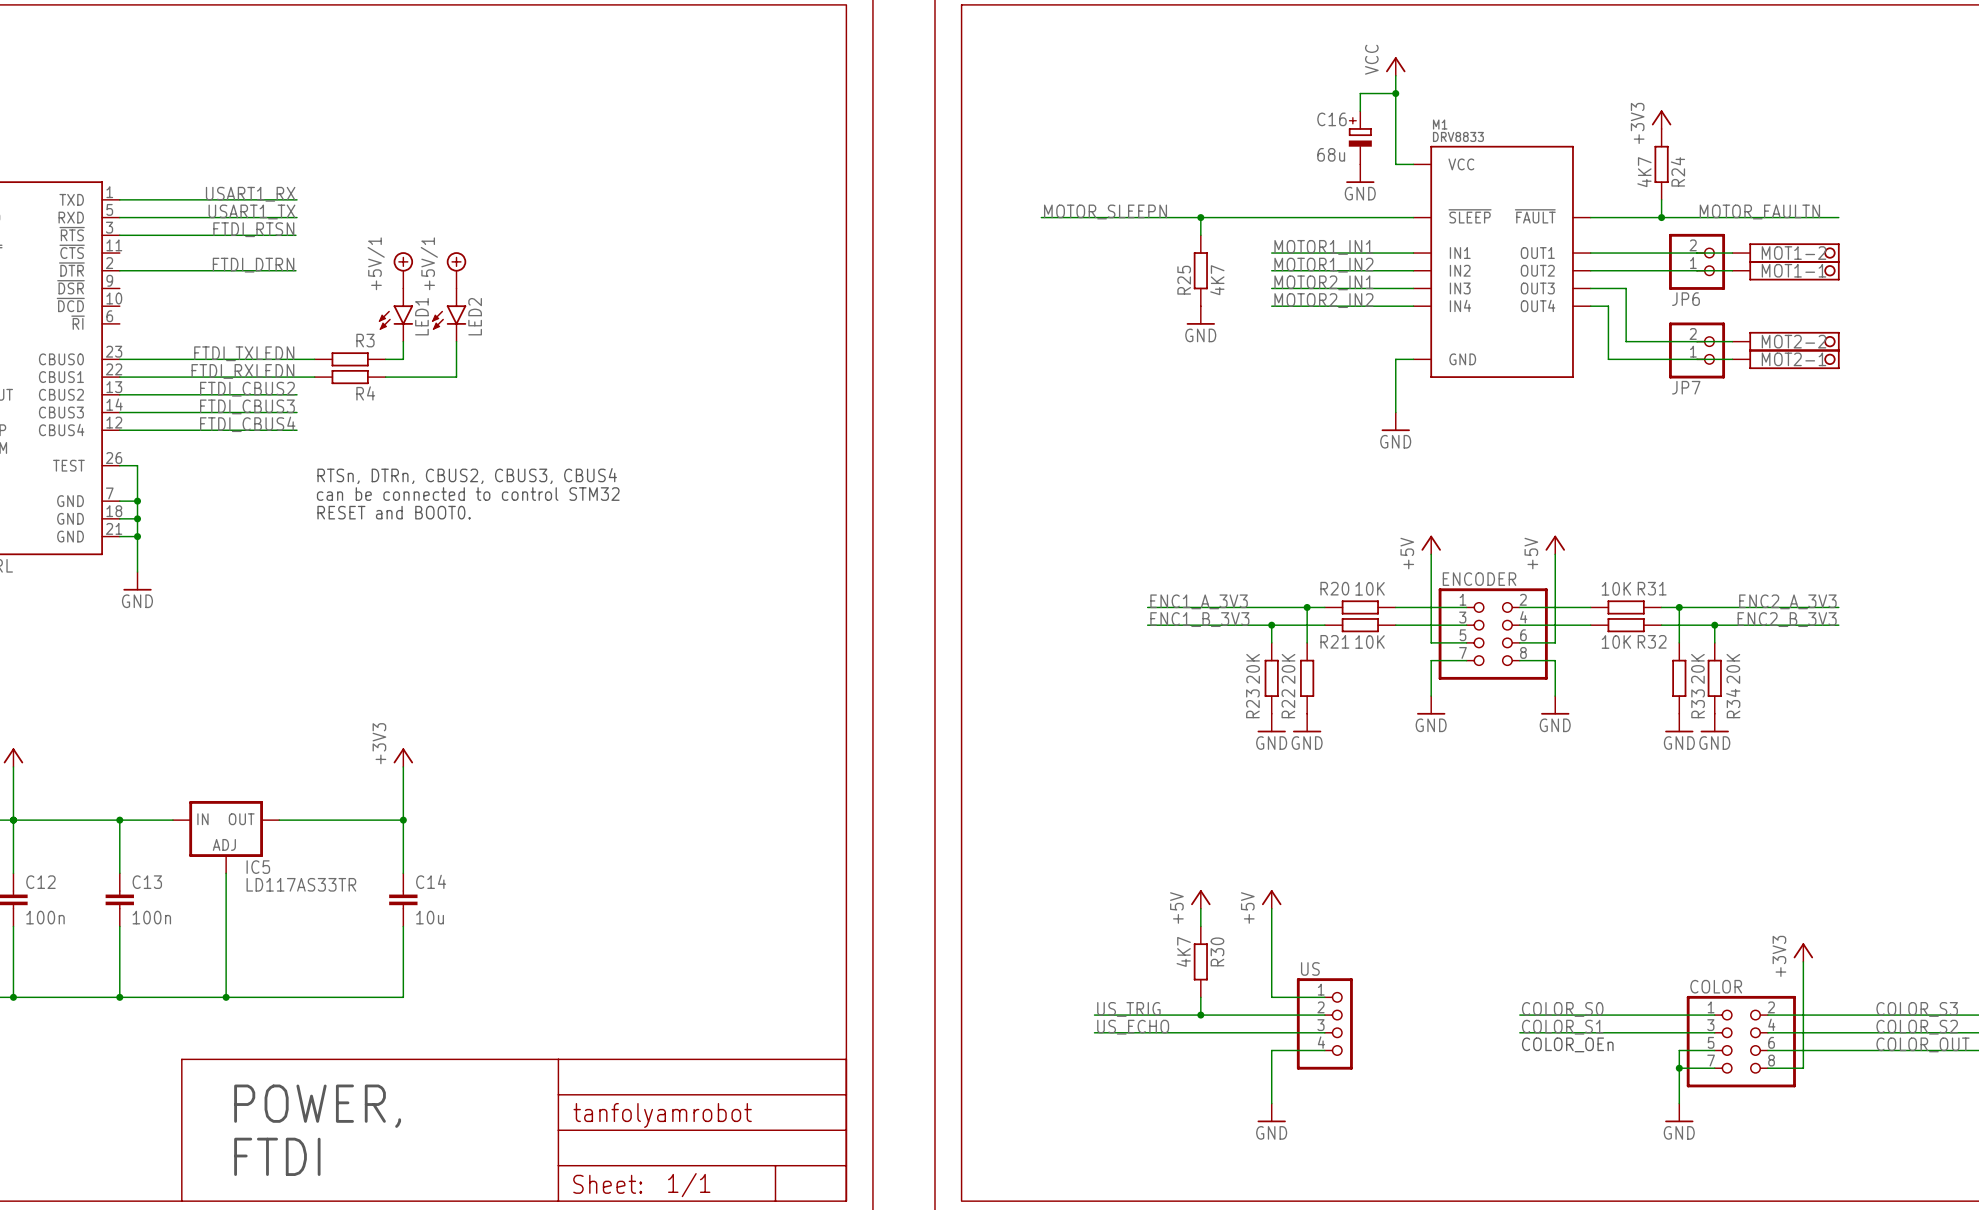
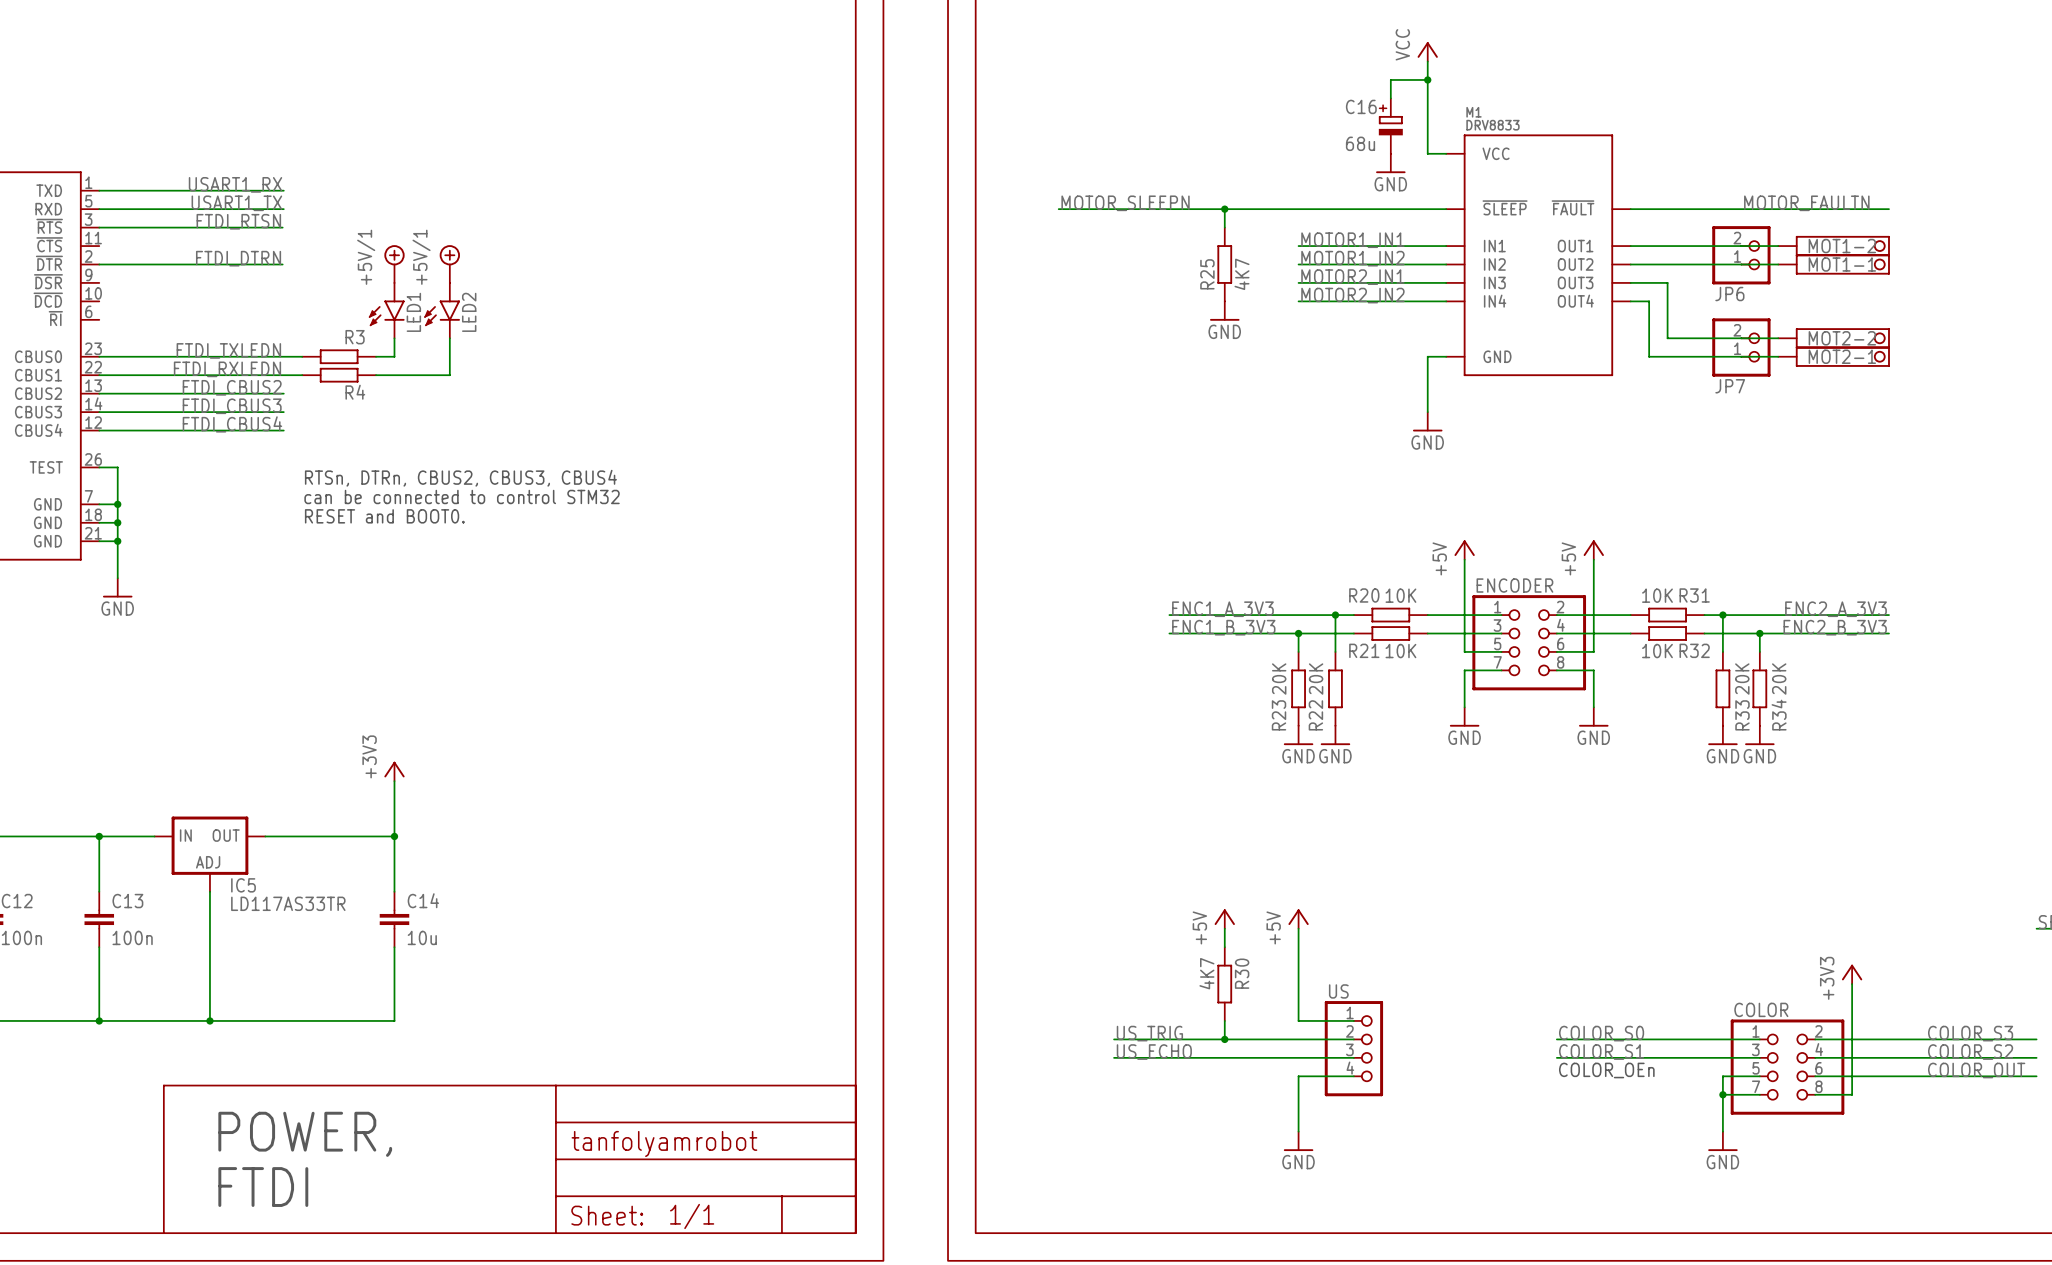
power symbol: +3V3 (1661, 119) -> none
R24: 4K7 (1661, 164) -> none
wire: (1661, 199) (1661, 217) -> none
junction: (1661, 217) -> none

